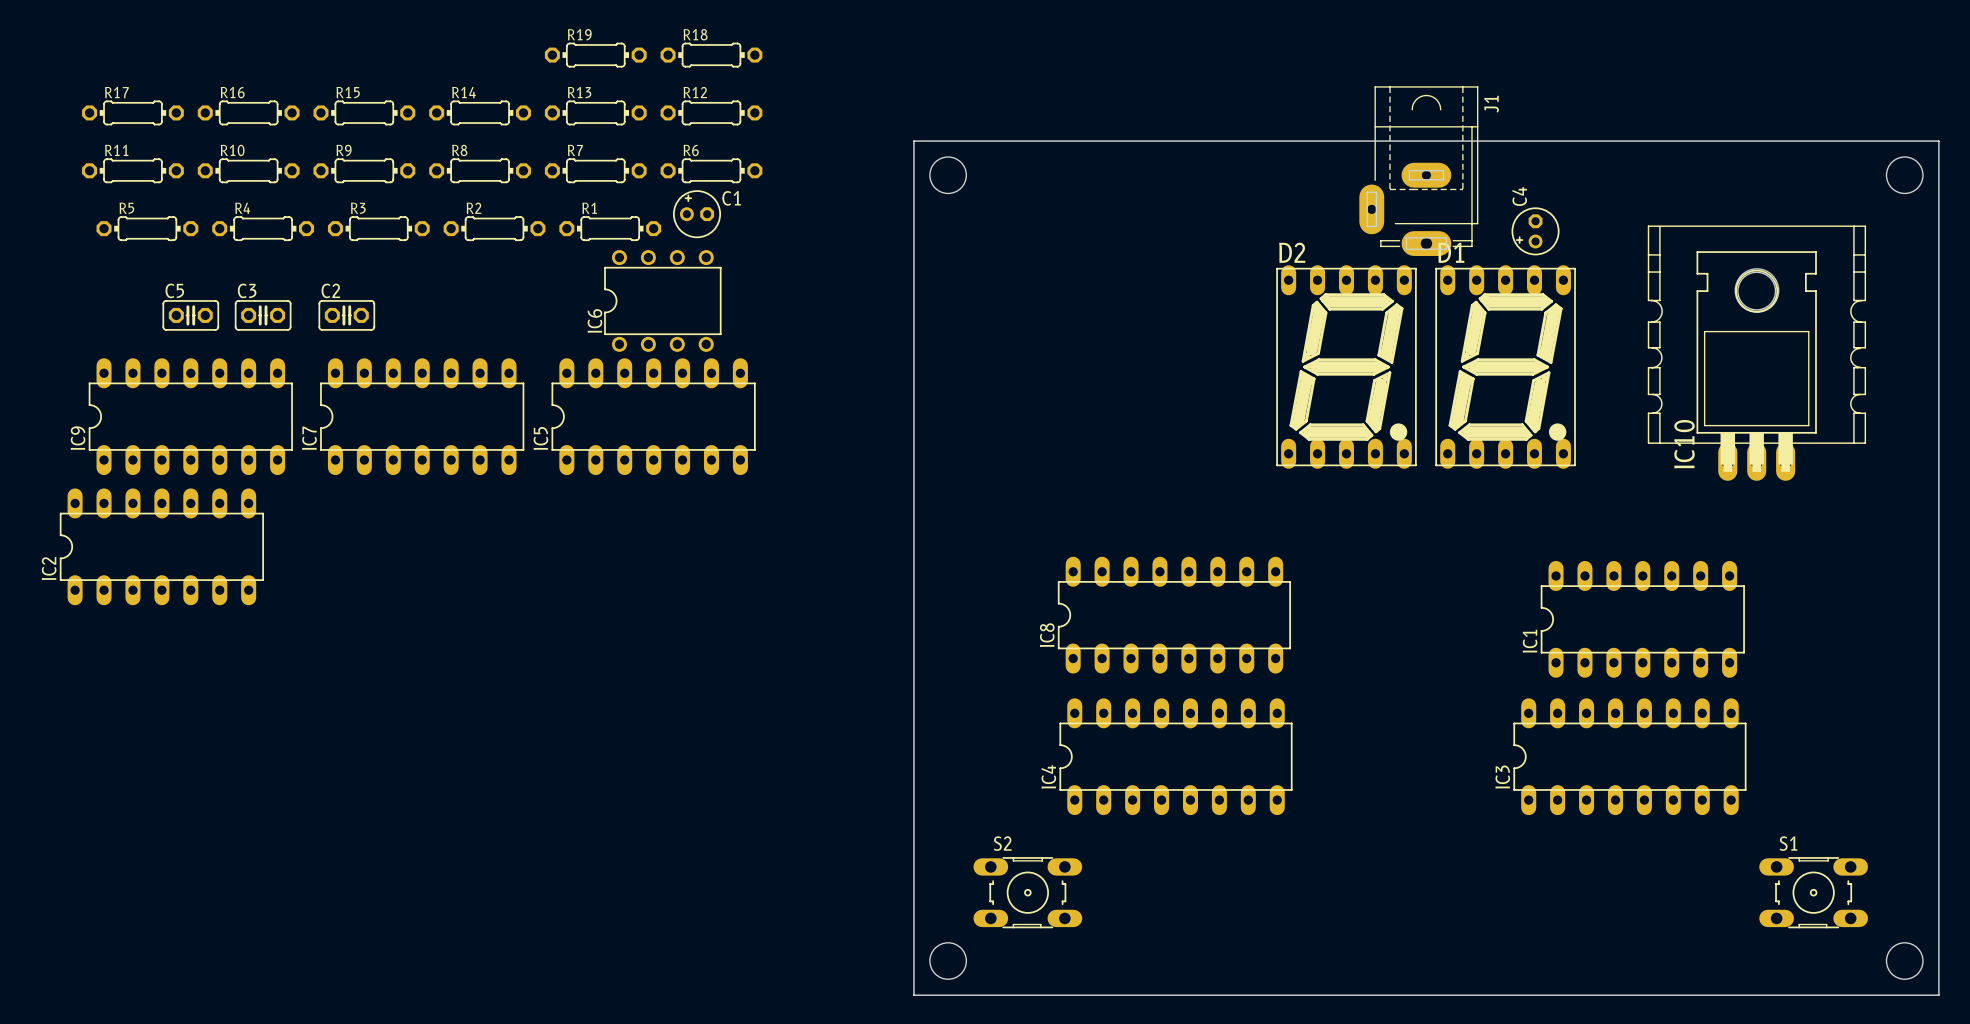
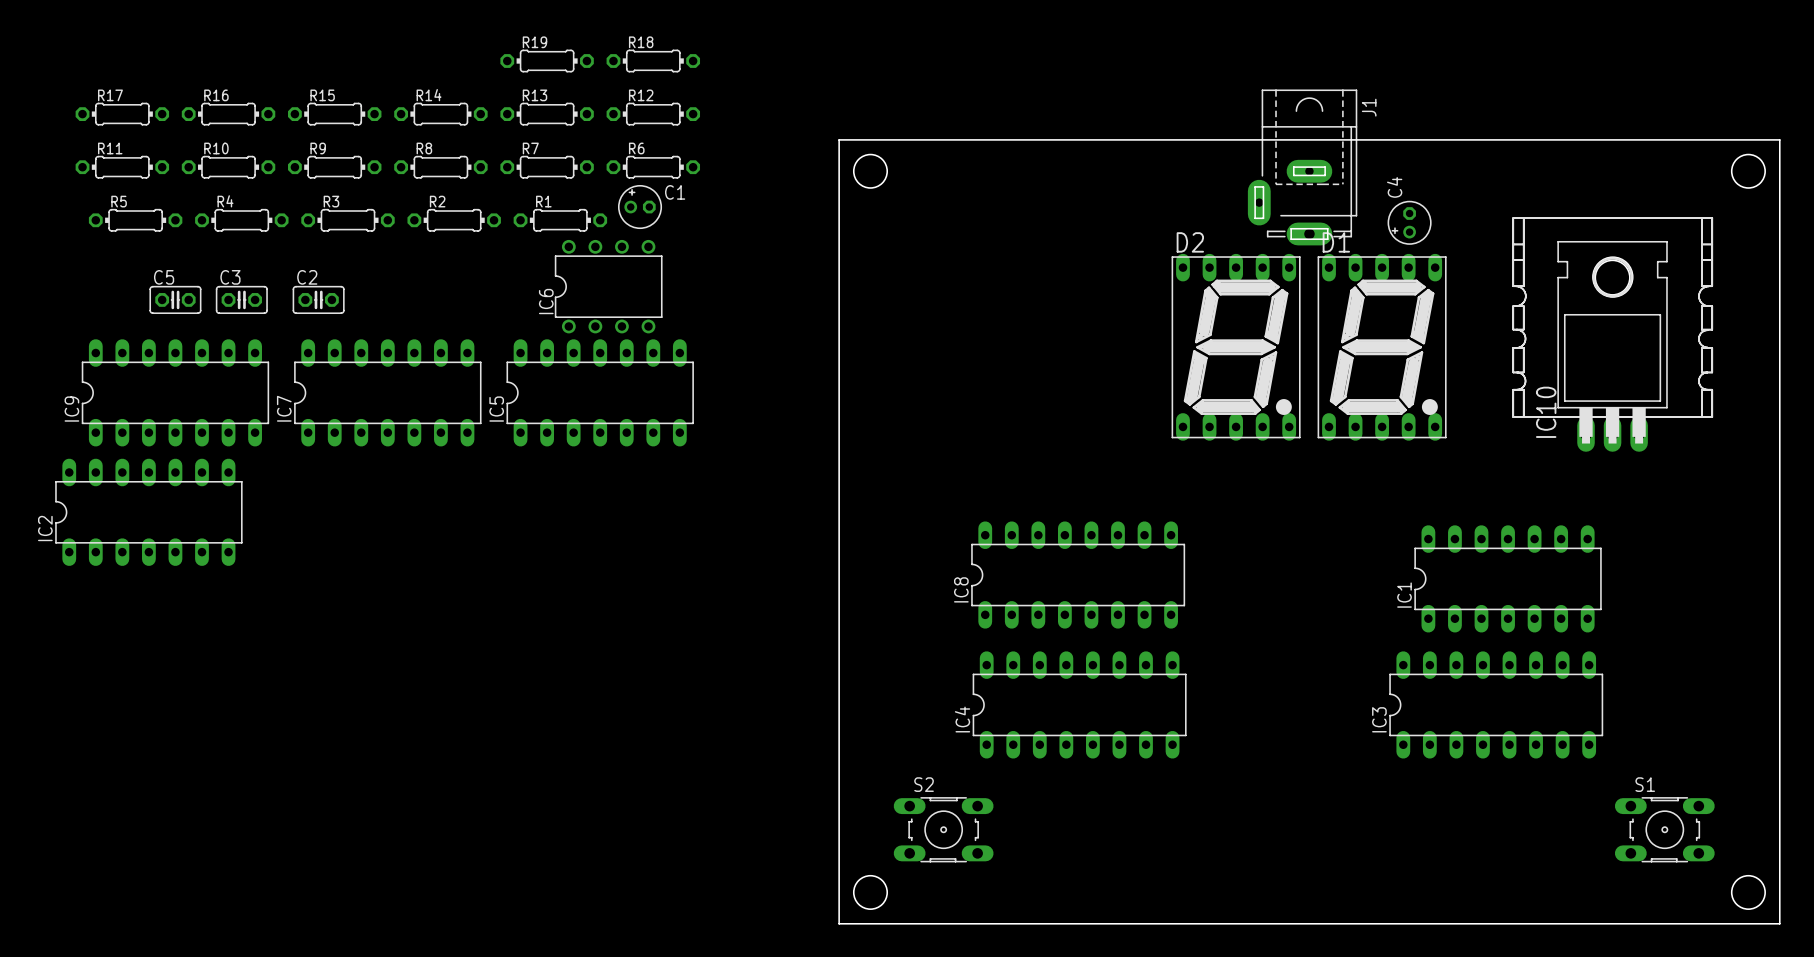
drawing: none -> [1512, 217, 1714, 418]

